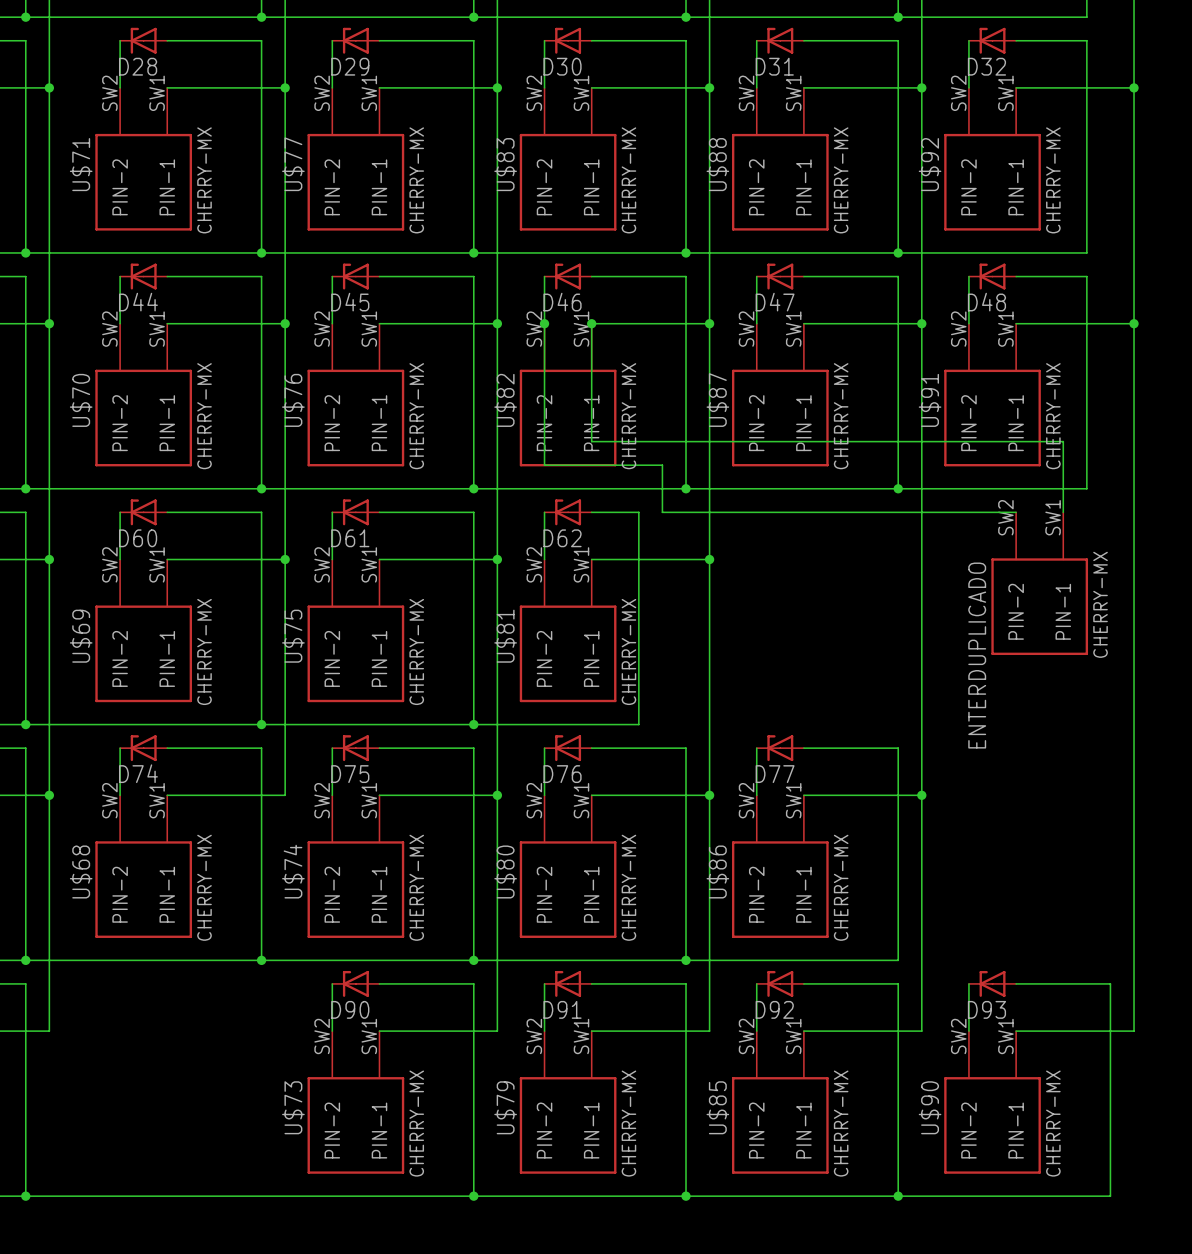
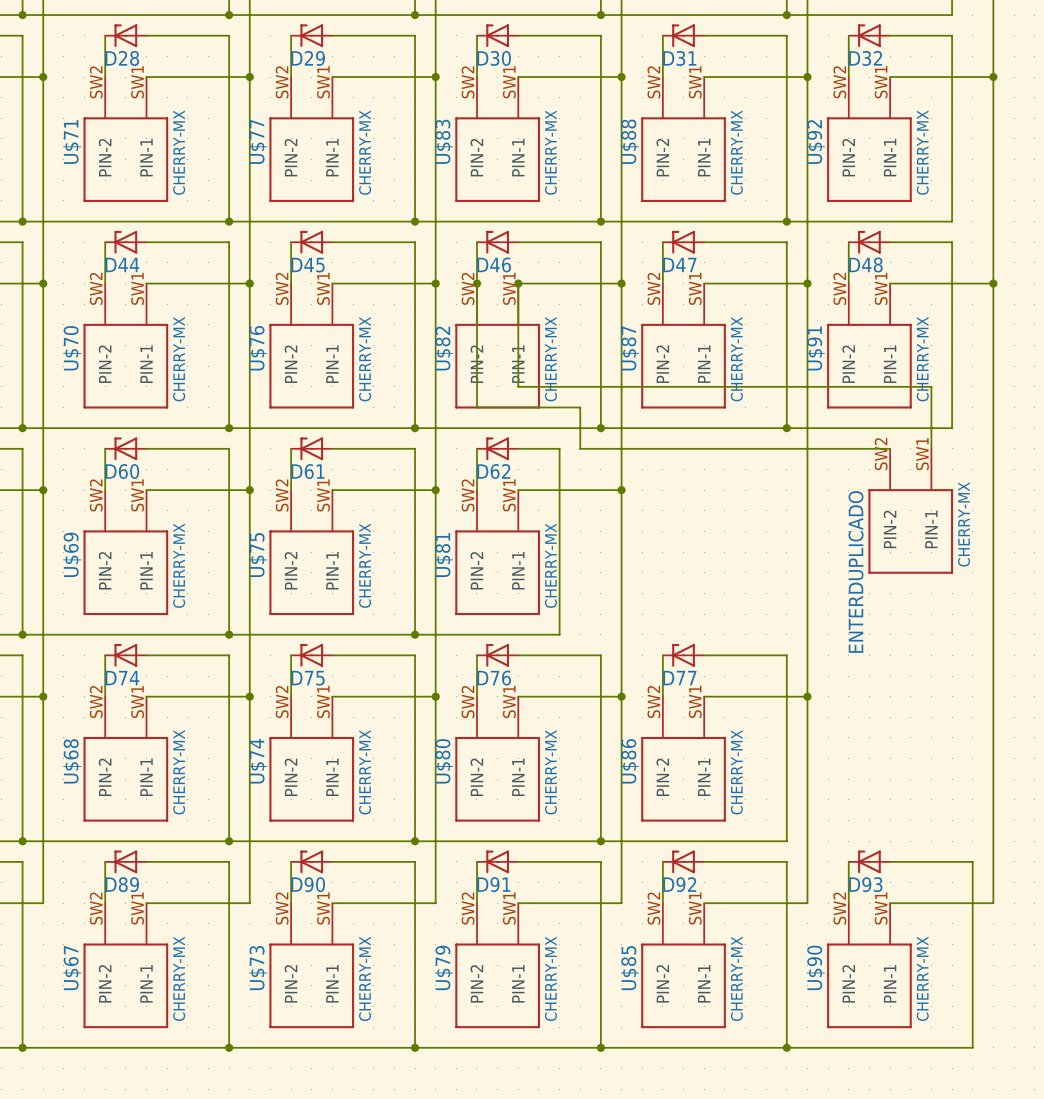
wire: none -> (249, 696) (249, 903) (146, 903)
junction: none -> (249, 696)
wire: none -> (105, 861) (105, 903)
D89: none -> (125, 861)
wire: none -> (146, 861) (229, 861) (229, 1047)
U$67: none -> (125, 965)
junction: none -> (229, 1047)

